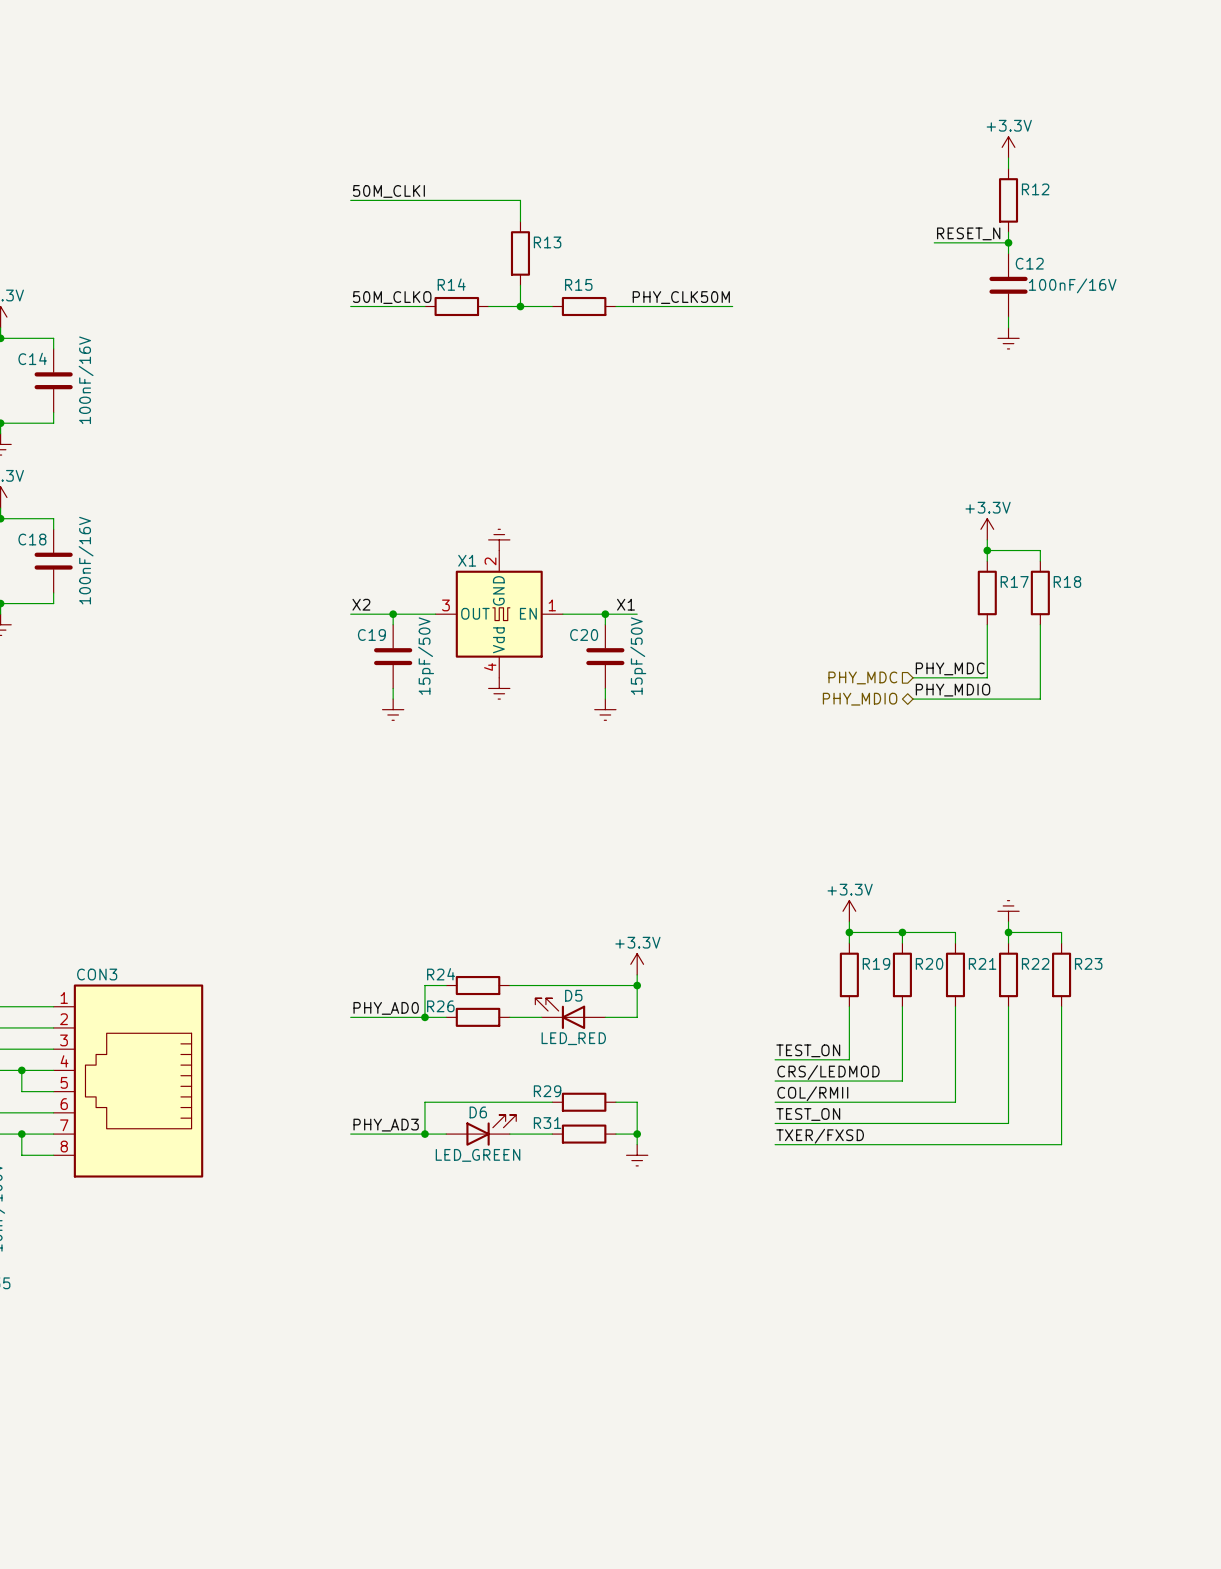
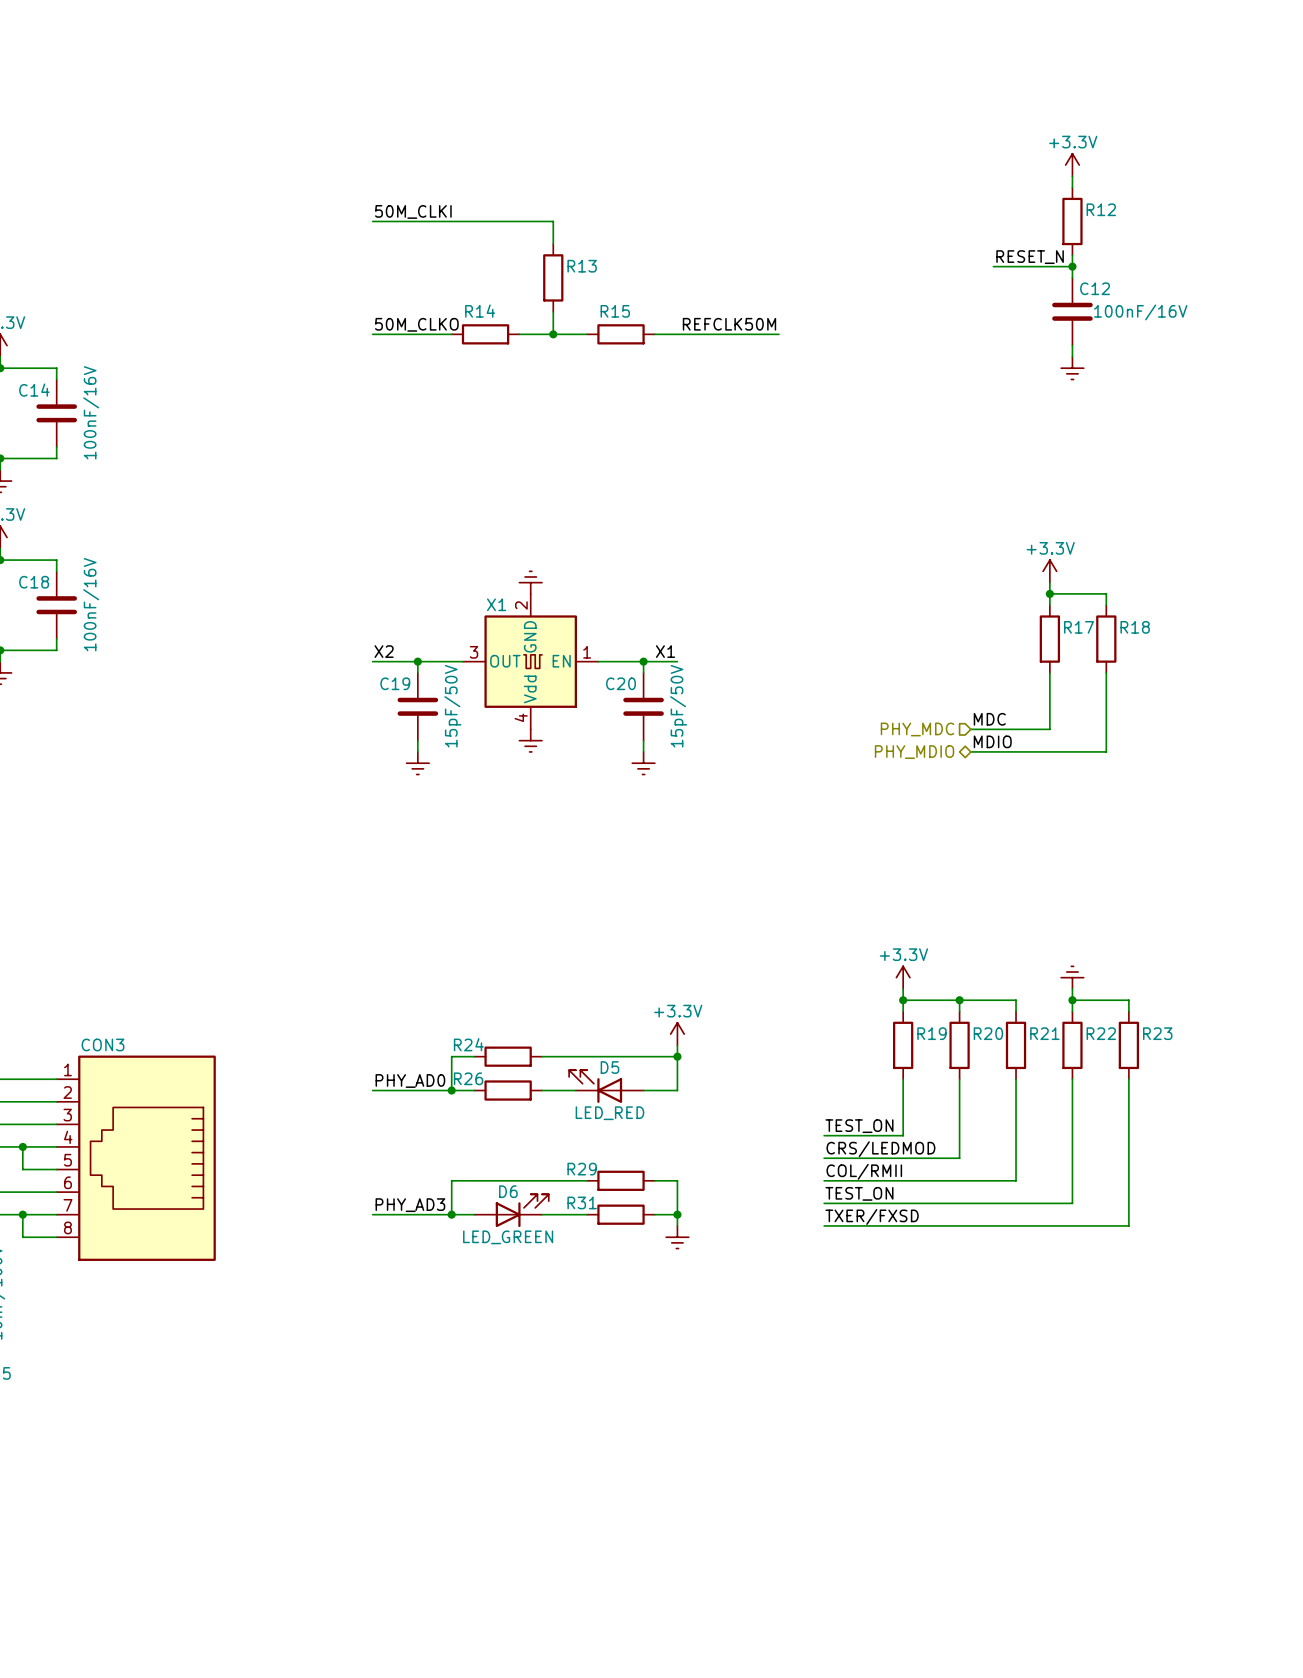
label: PHY_CLK50M (681, 297) -> REFCLK50M (729, 324)
label: PHY_MDC (950, 668) -> MDC (989, 719)
label: PHY_MDIO (953, 690) -> MDIO (992, 741)

